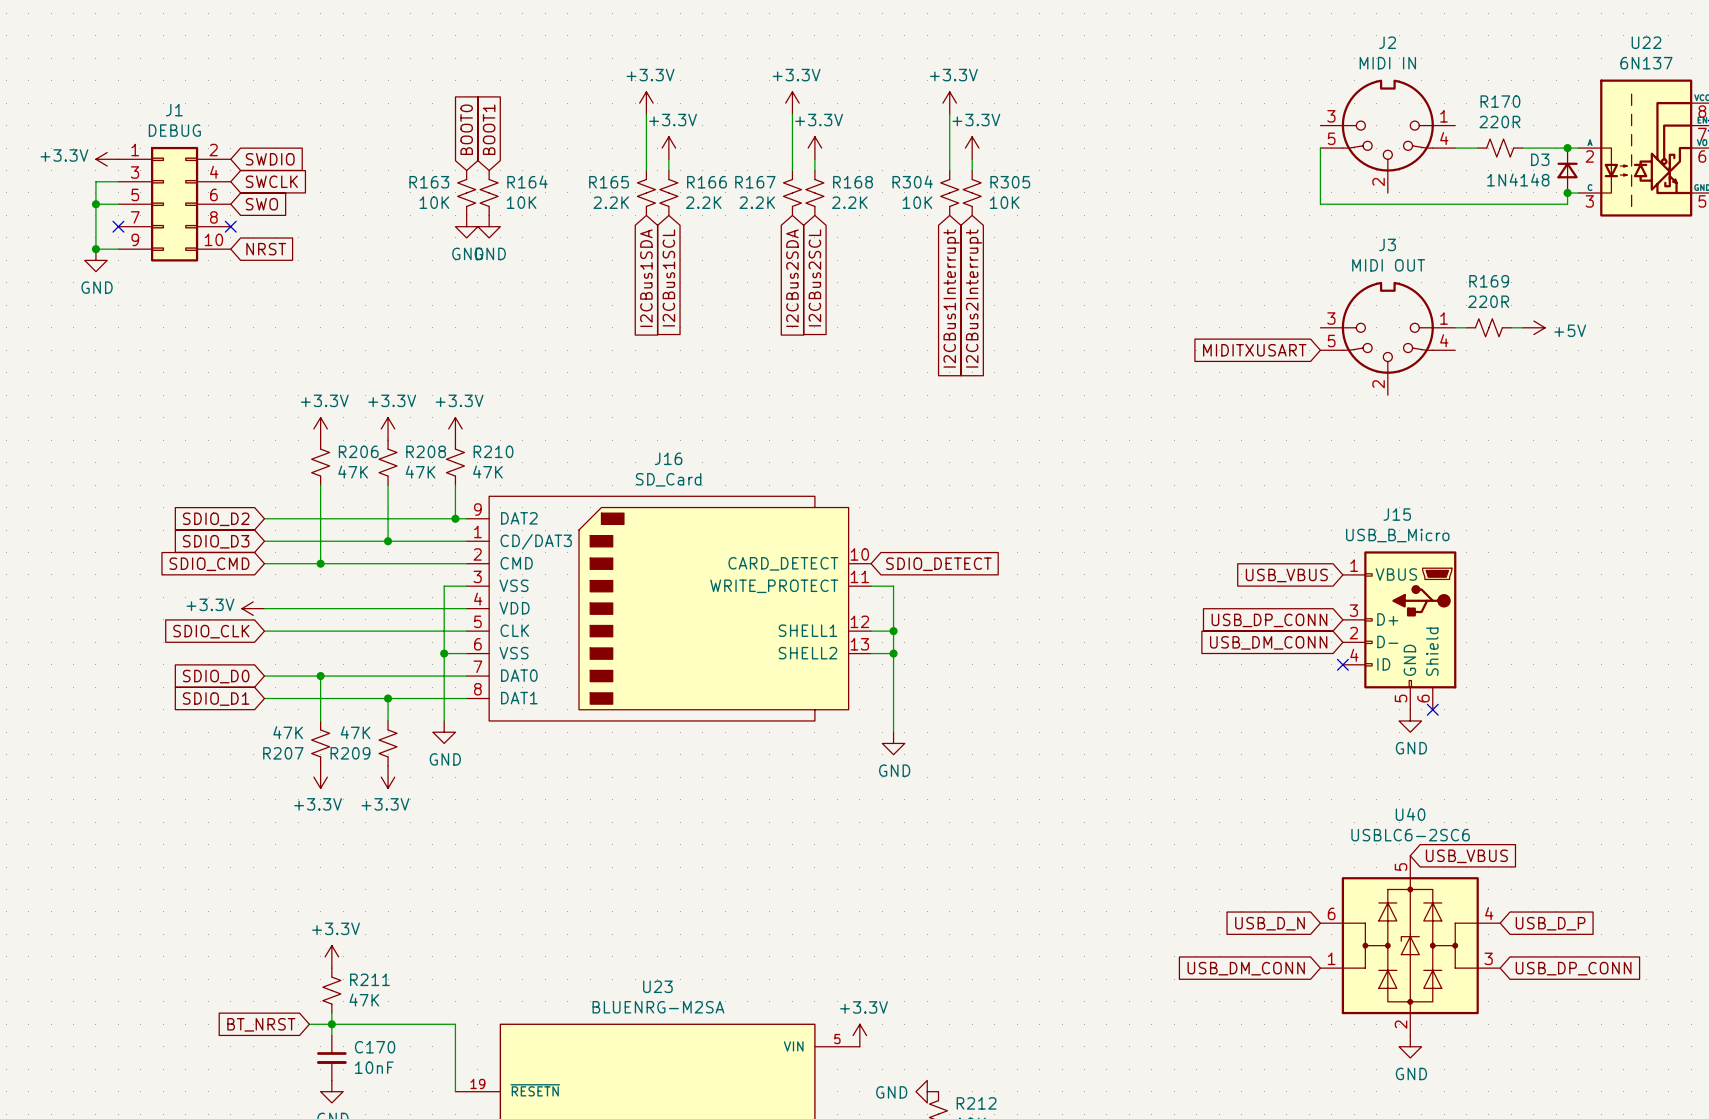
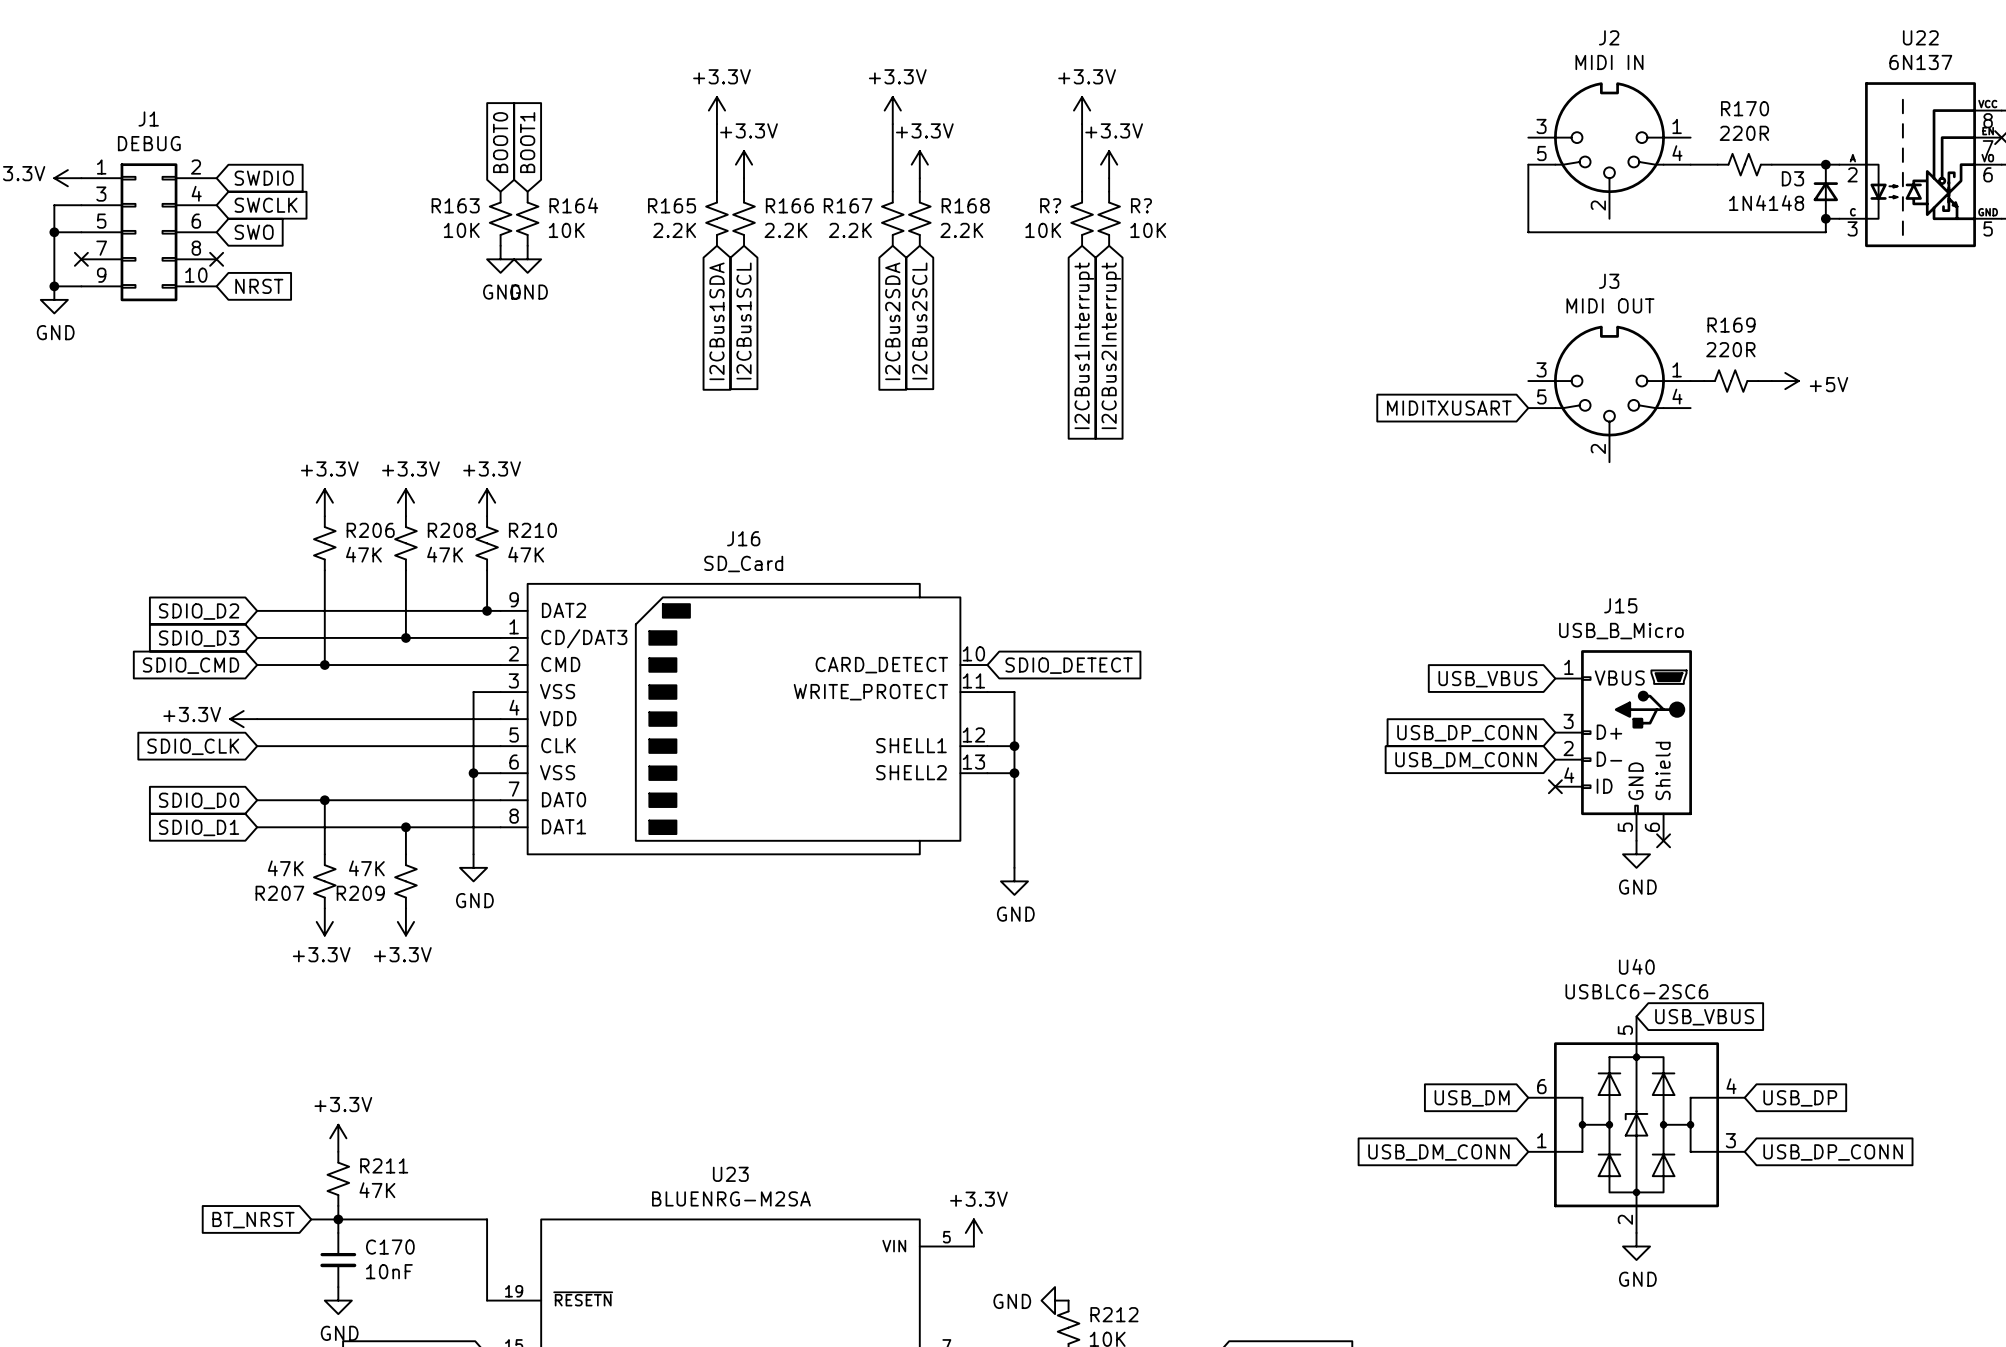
R304 name: R304 (912, 181) -> R? (1050, 205)
R305 name: R305 (1010, 182) -> R? (1141, 205)
global label: USB_D_N (1269, 923) -> USB_DM (1472, 1098)
global label: USB_D_P (1550, 923) -> USB_DP (1800, 1098)

